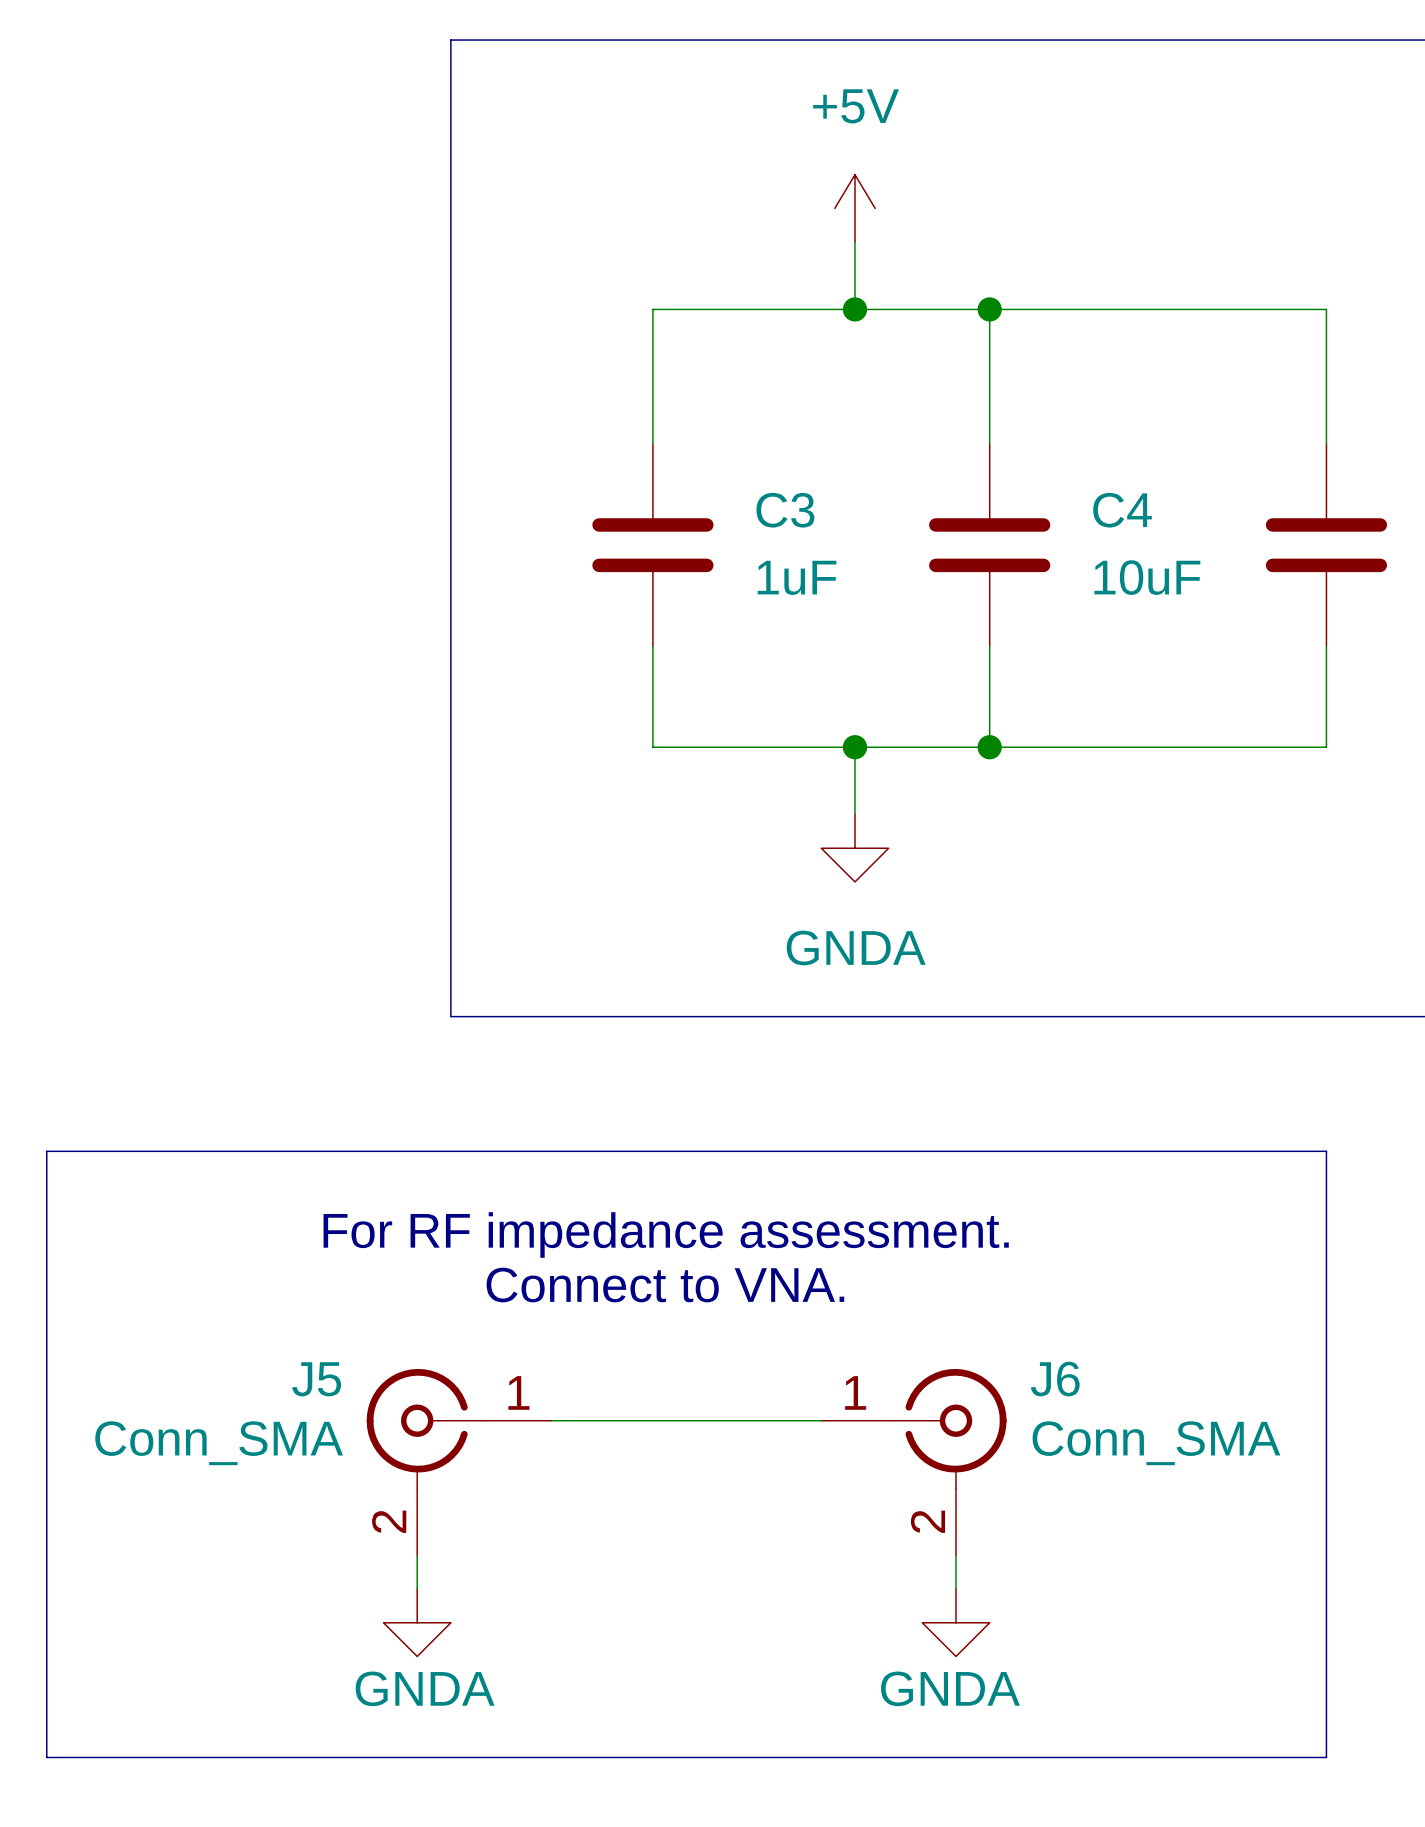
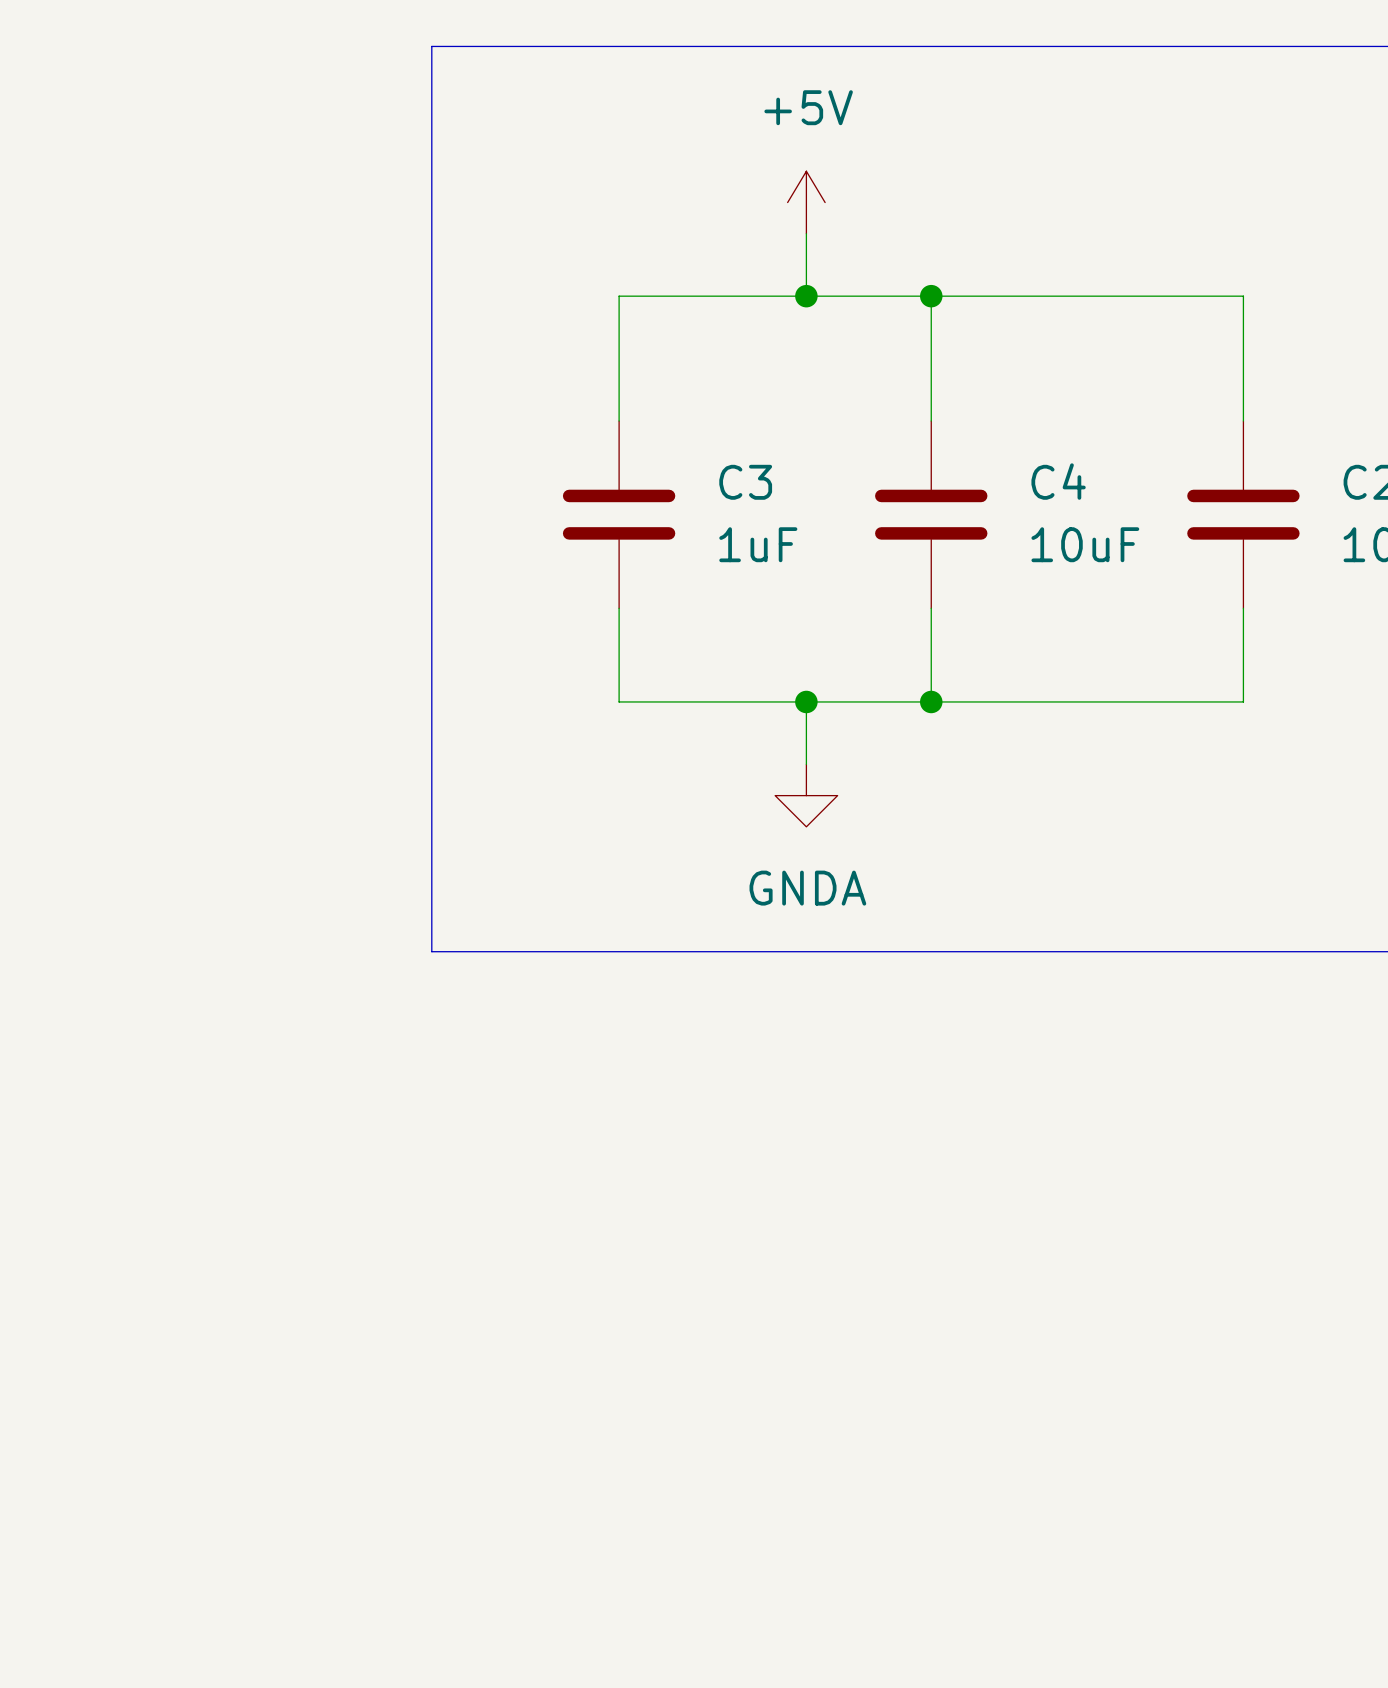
line: (46, 1151) (1326, 1151) (1326, 1757) (46, 1757) (46, 1151) -> none
text: For RF impedance assessment. (666, 1235) -> none
text: Connect to VNA. (665, 1285) -> none
wire: (551, 1420) (821, 1420) -> none
J5: Conn_SMA (459, 1462) -> none
J6: Conn_SMA (913, 1462) -> none
wire: (417, 1555) (417, 1589) -> none
wire: (956, 1555) (956, 1589) -> none
power symbol: GNDA (417, 1622) -> none
power symbol: GNDA (956, 1622) -> none

